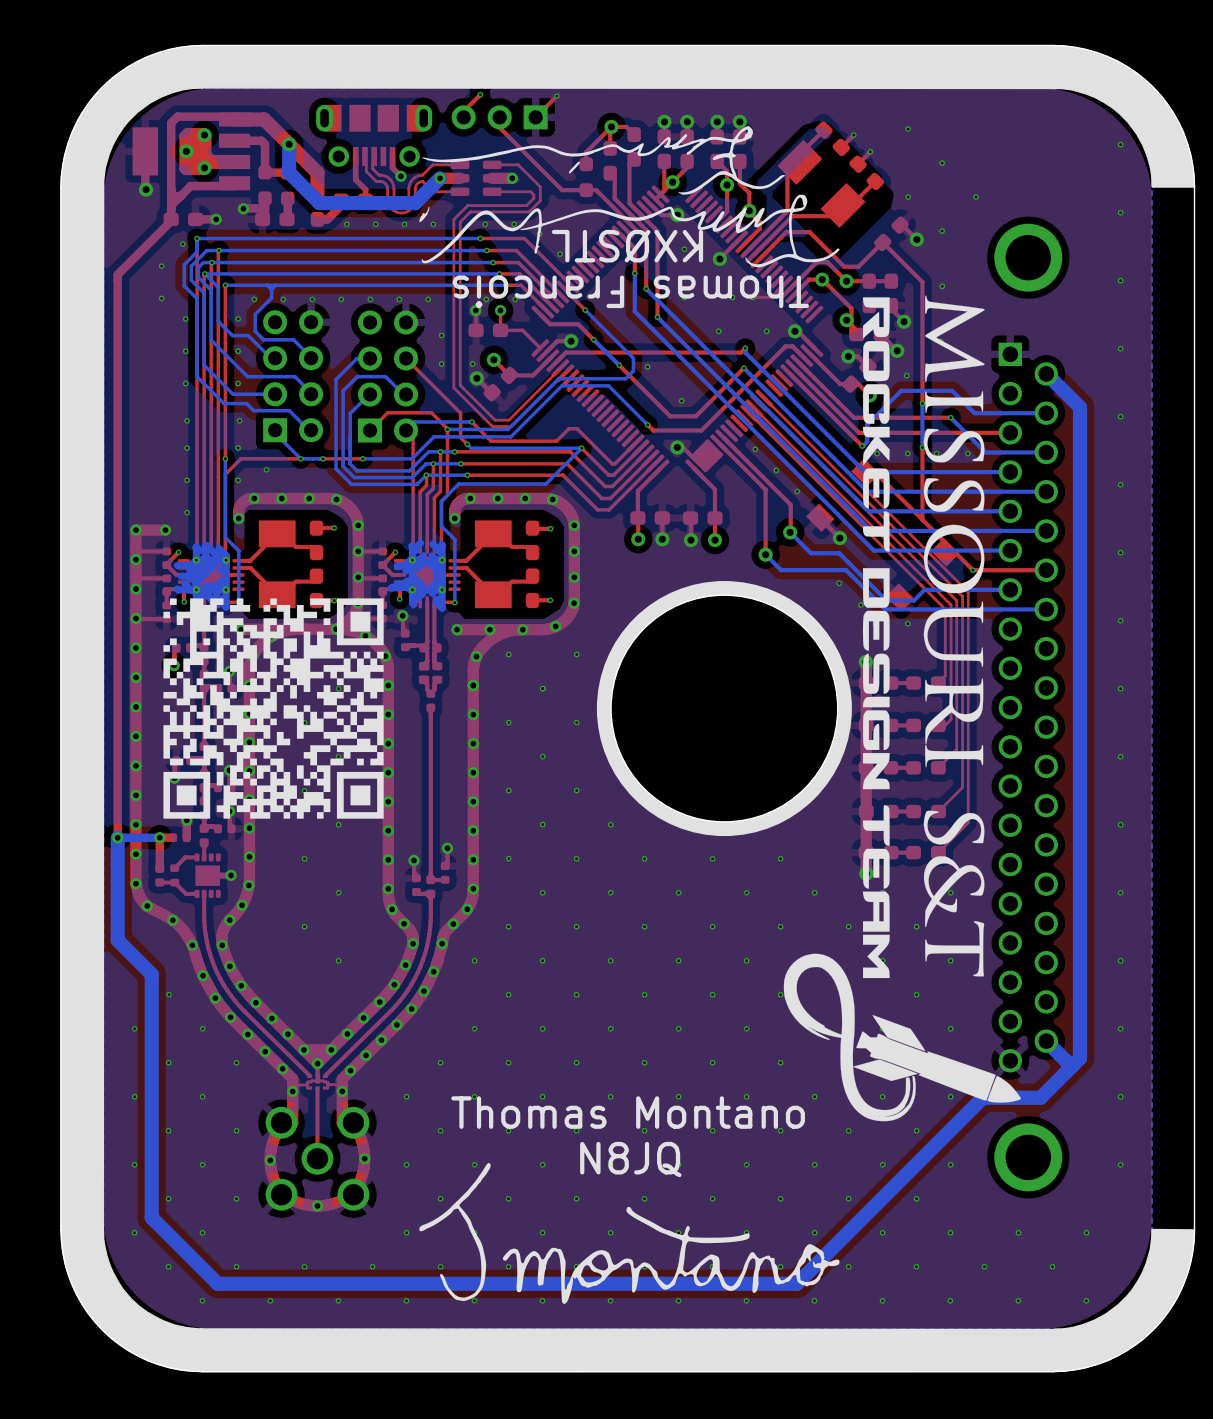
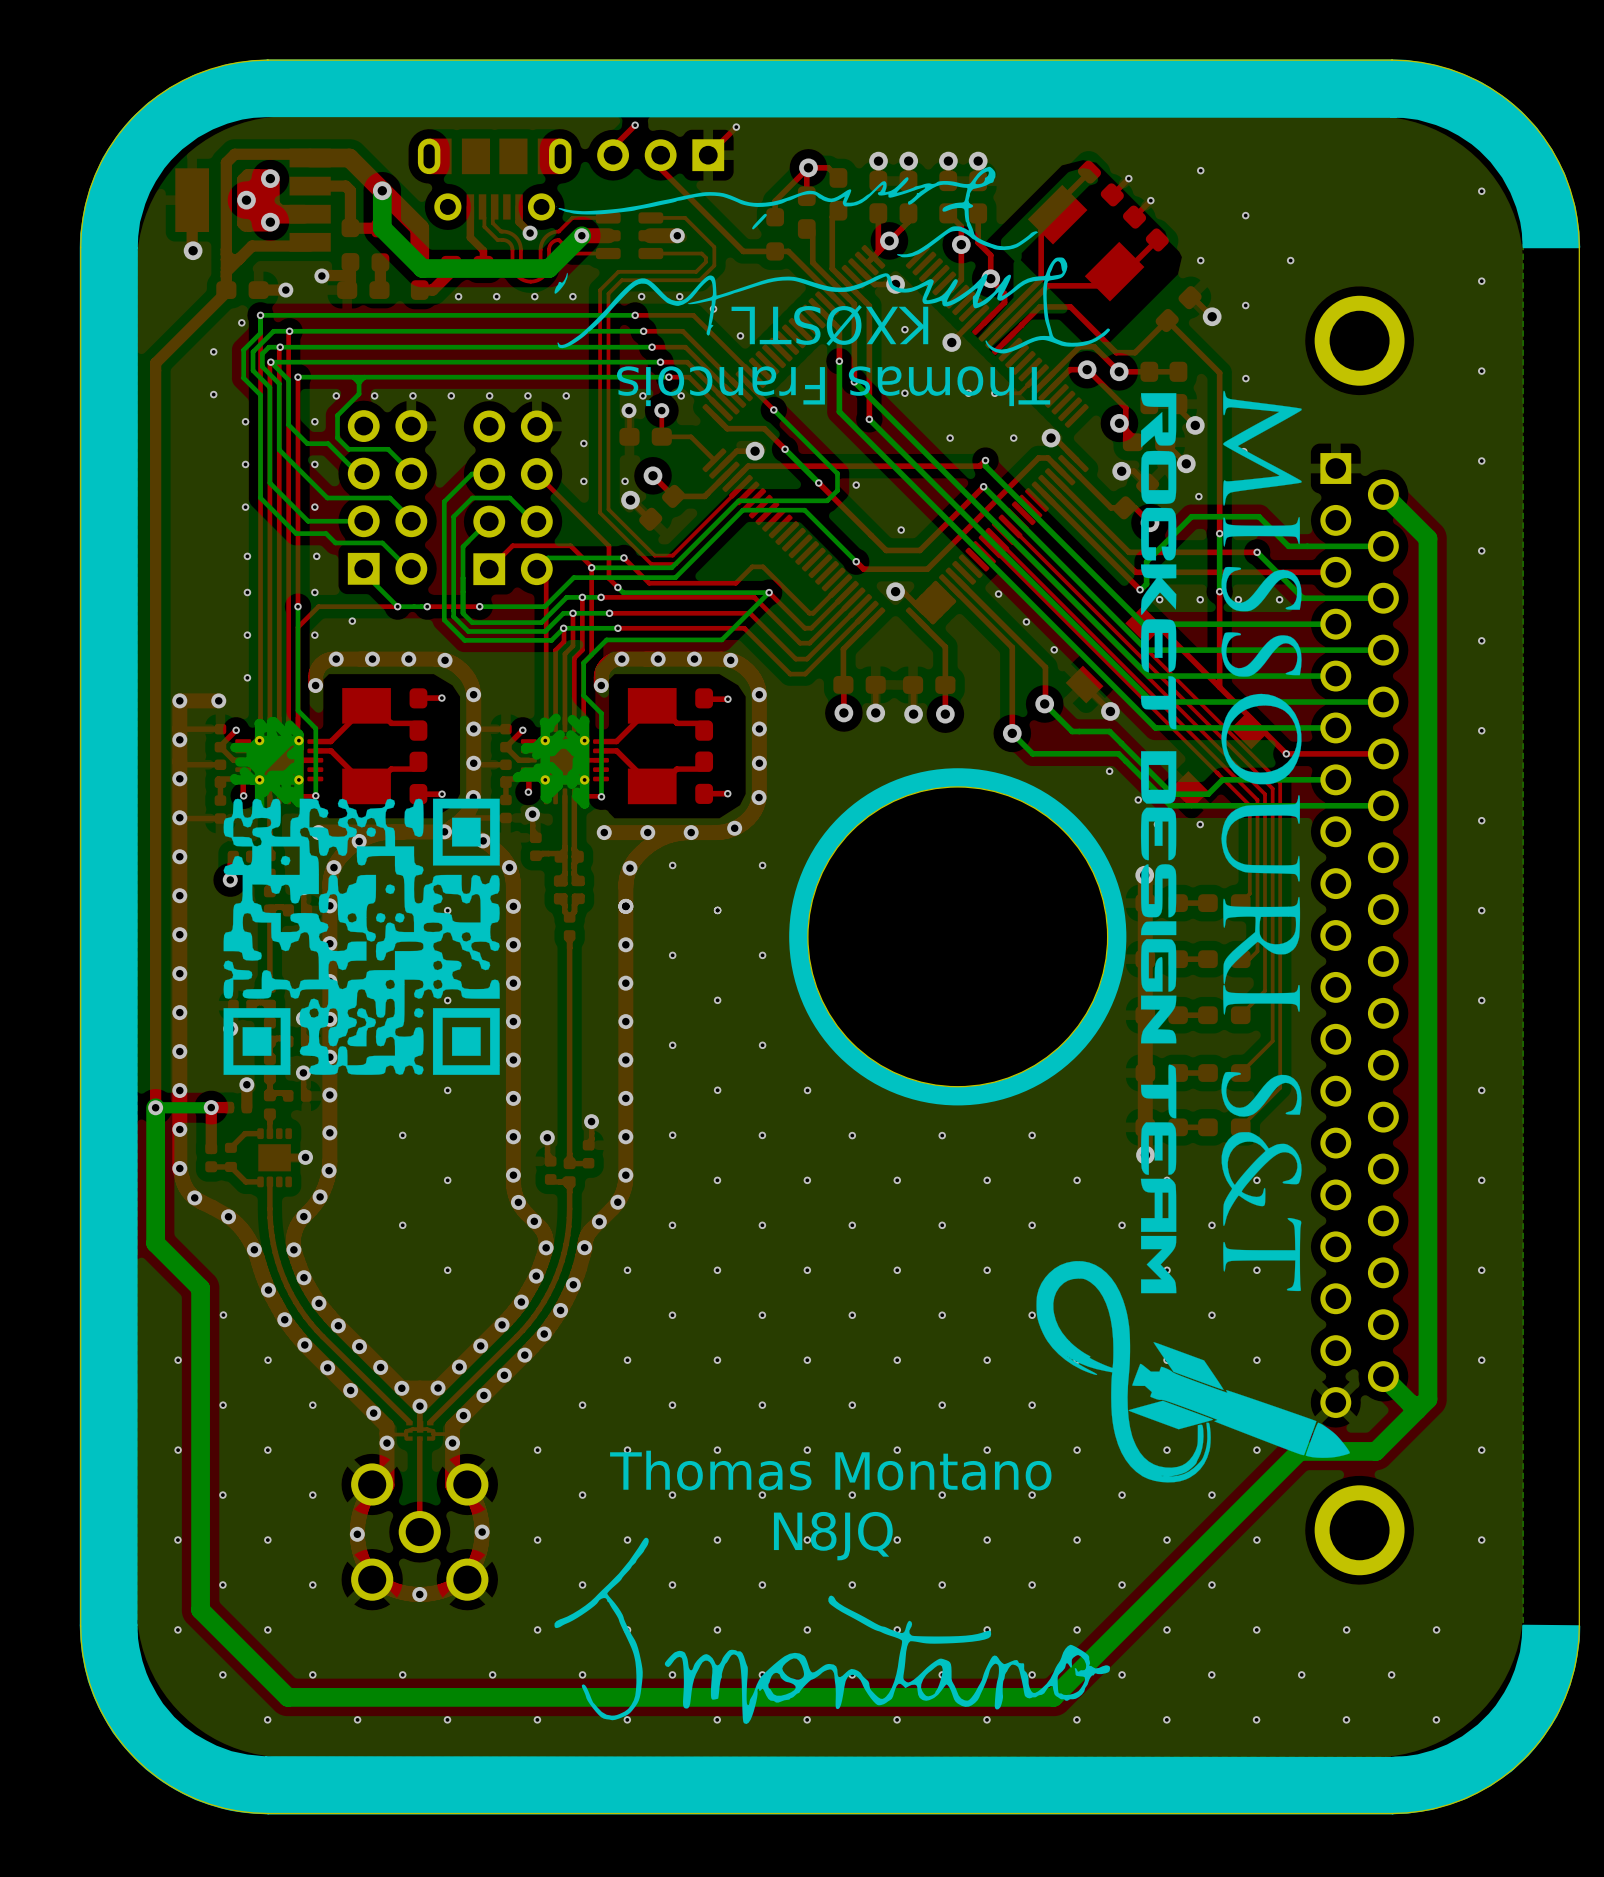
drawing shape: [163, 598, 384, 819] -> [223, 798, 500, 1075]

